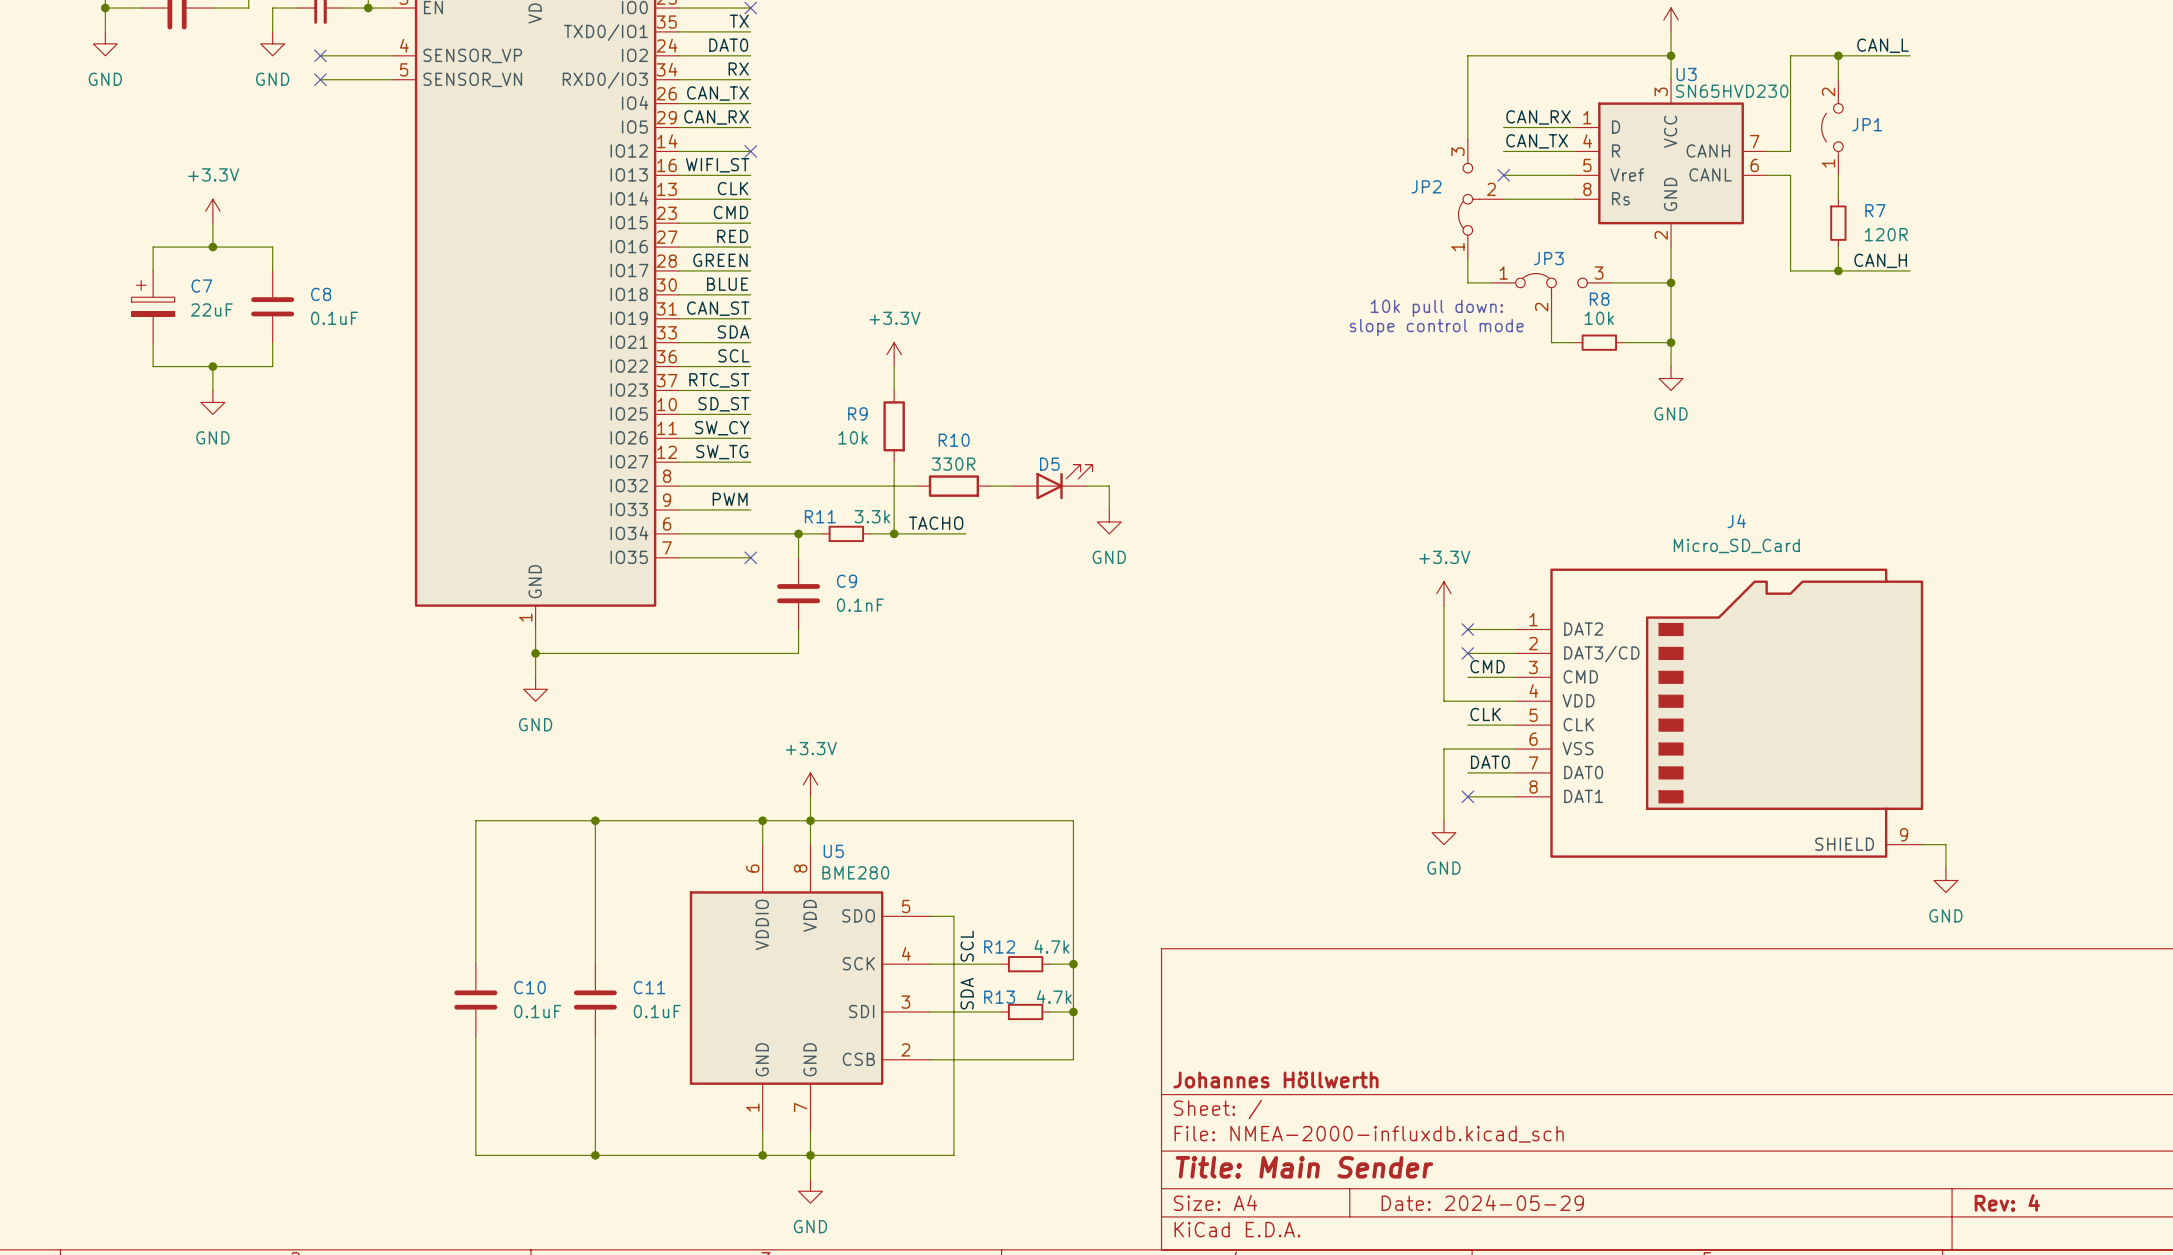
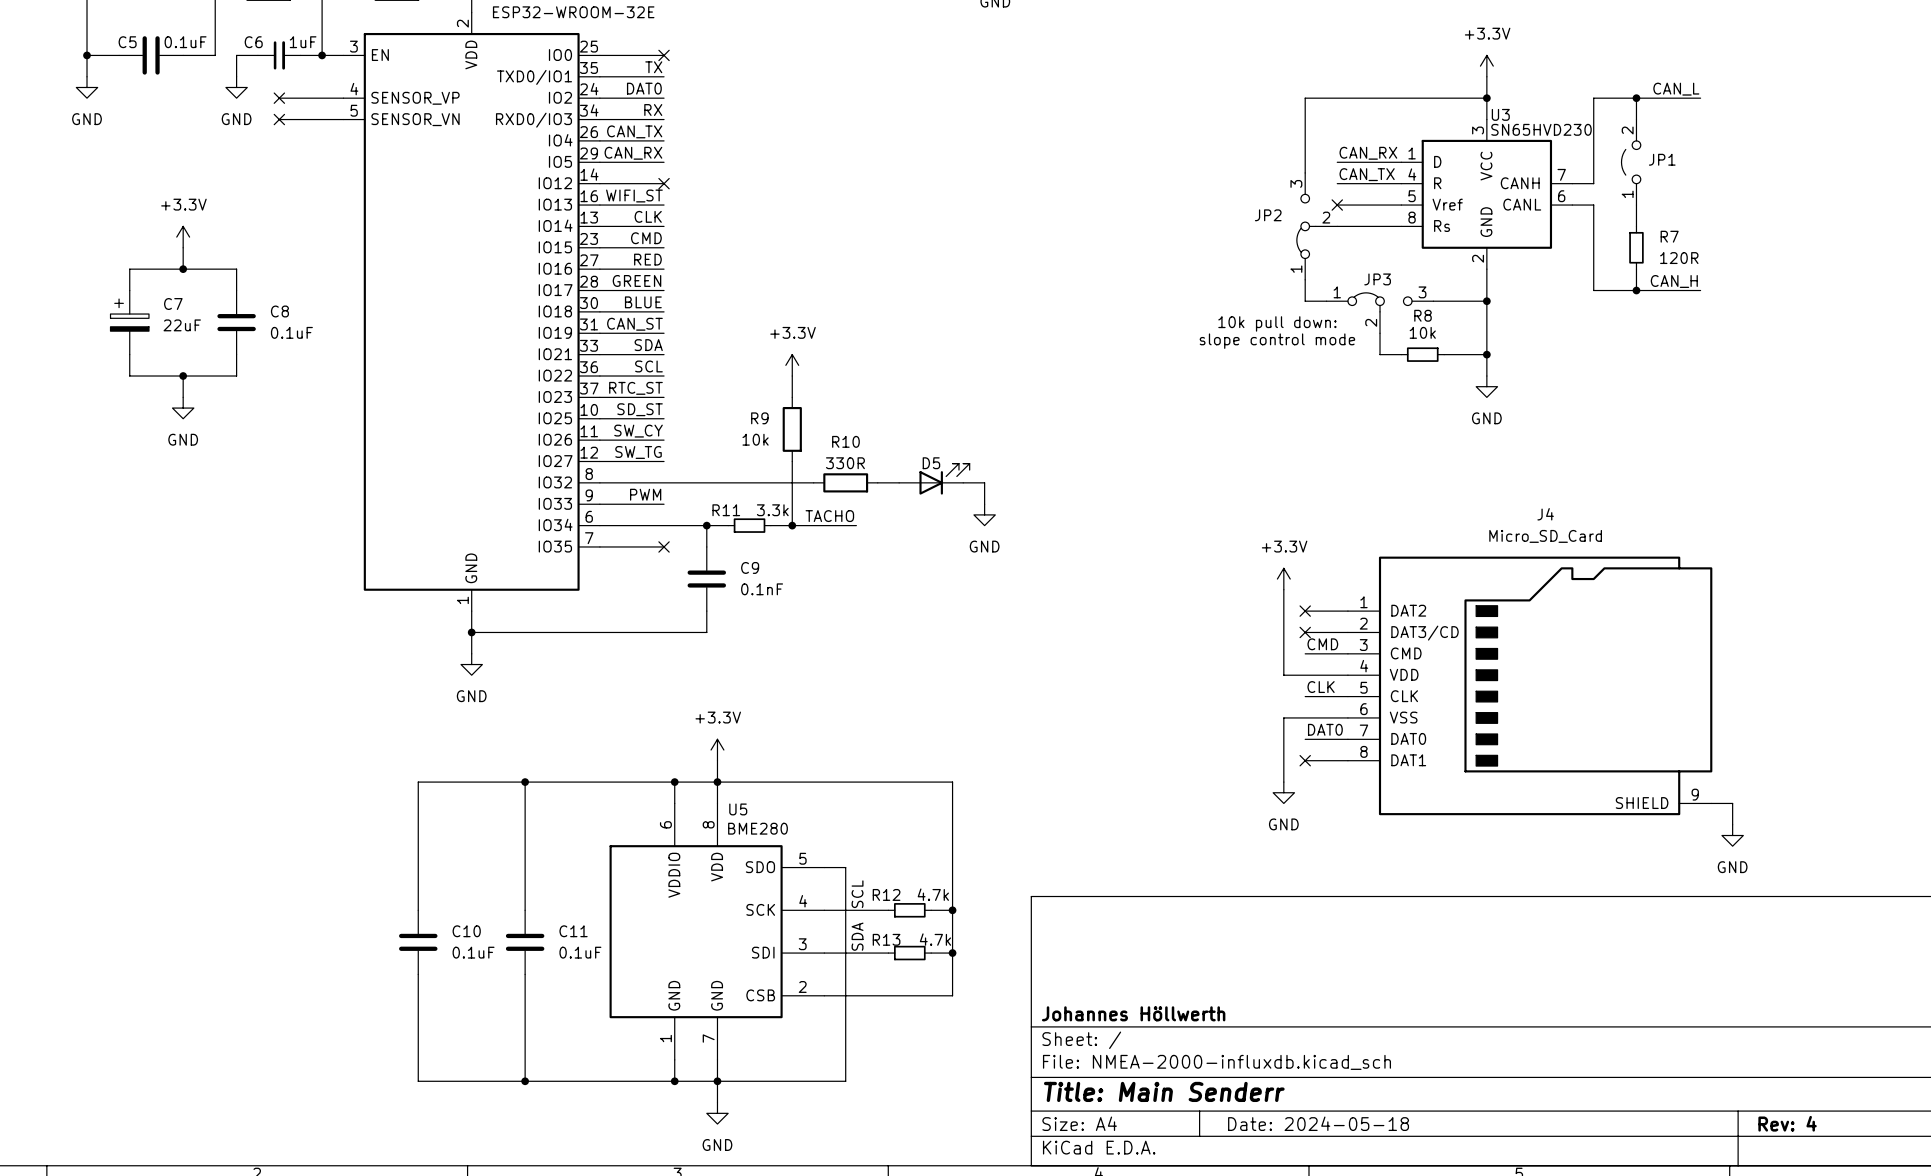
title block: Title: Main Sender (1304, 1167) -> Title: Main Senderr (1164, 1091)
title block: Date: 2024-05-29 (1482, 1202) -> Date: 2024-05-18 (1318, 1123)

